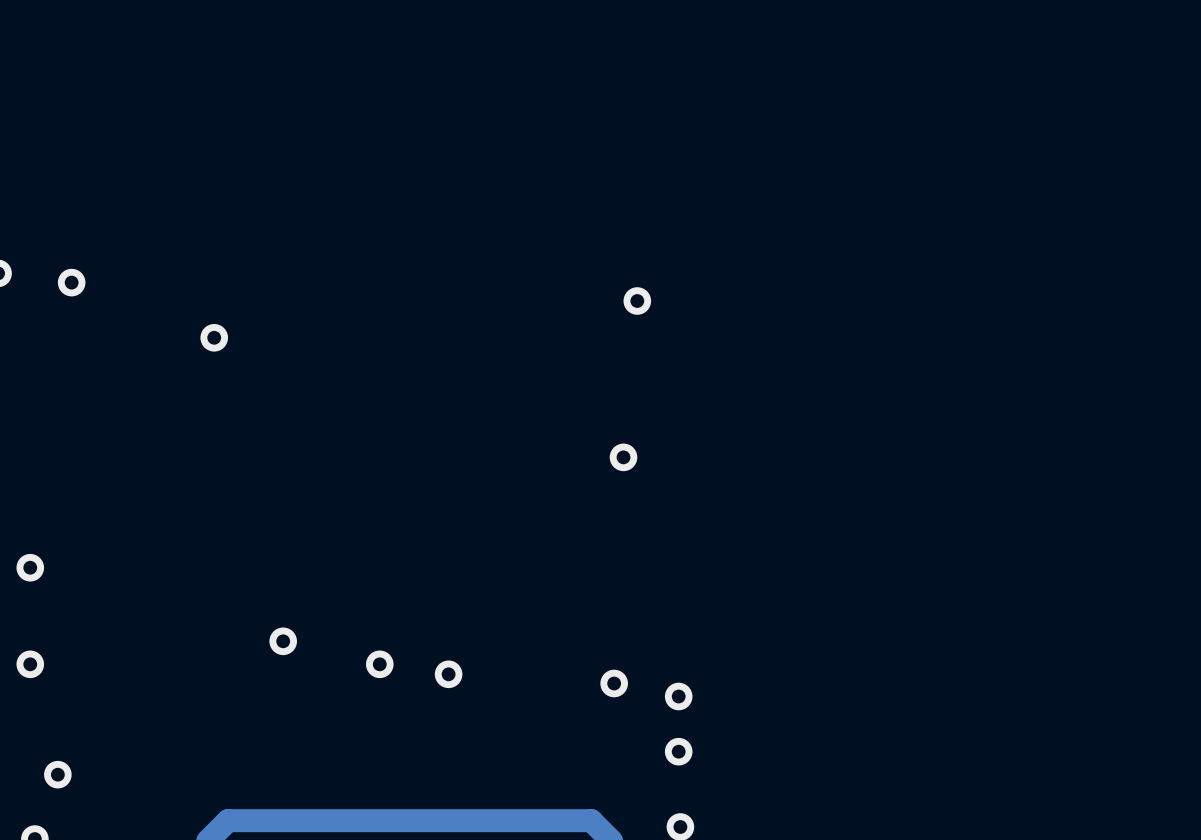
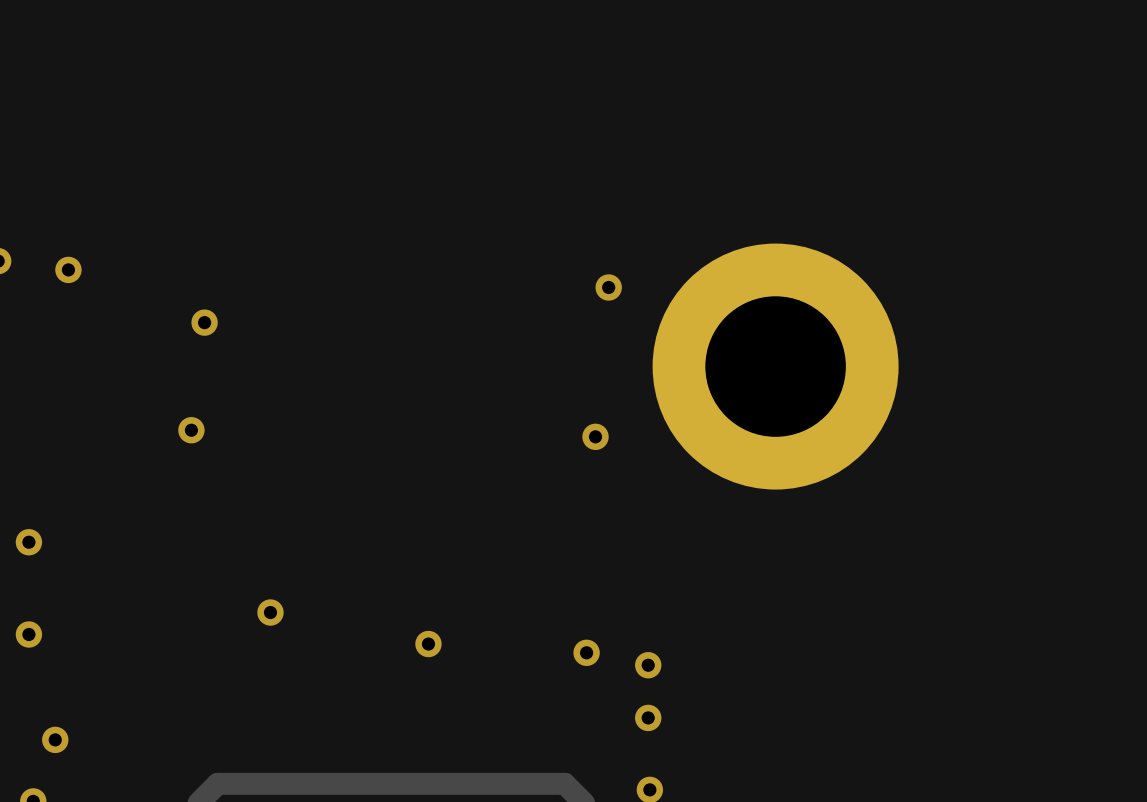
part: none -> (775, 366)
via: none -> (191, 430)
via: (379, 664) -> none

